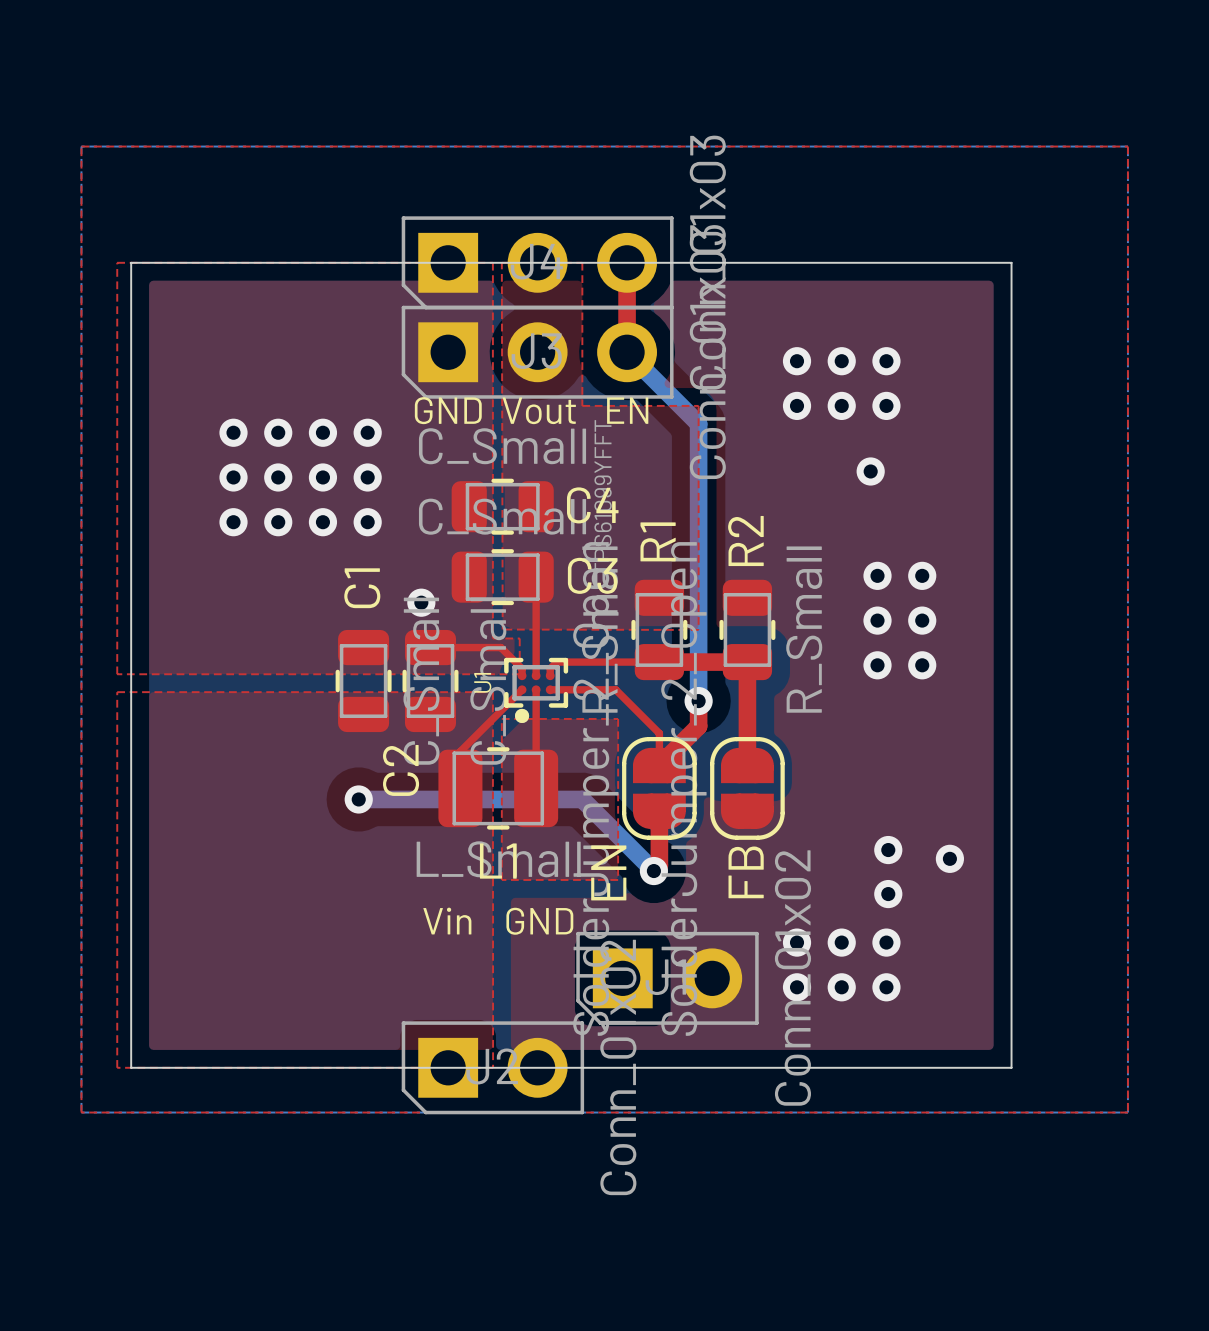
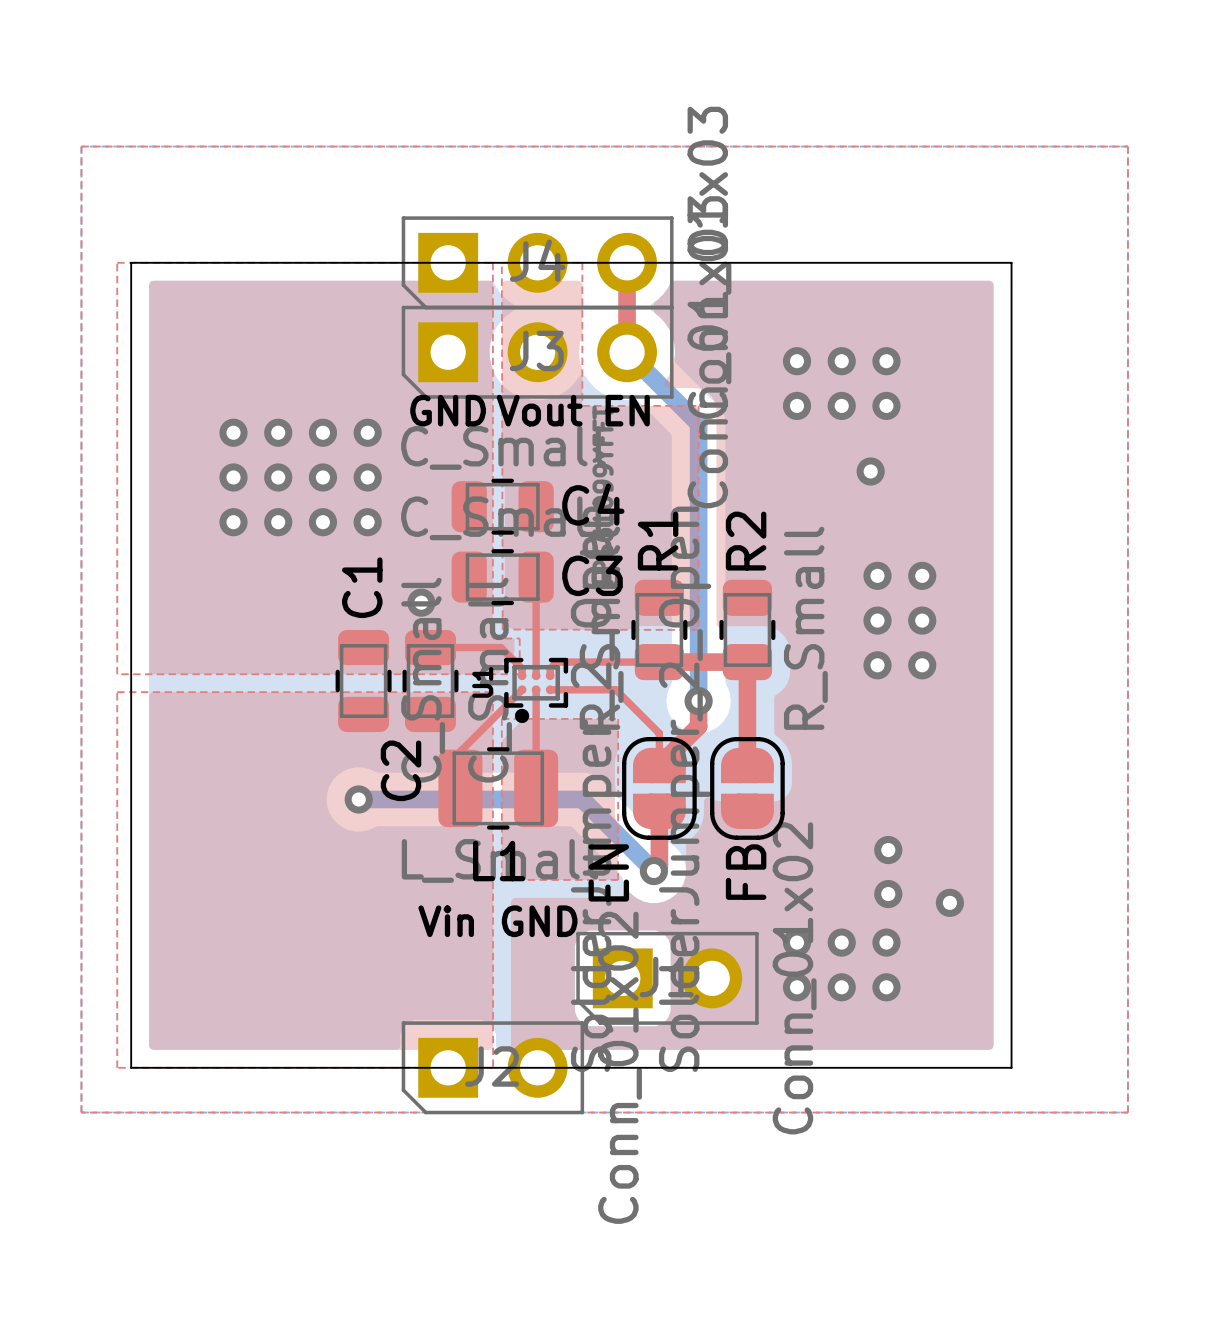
via position: (949, 858) -> (949, 902)

